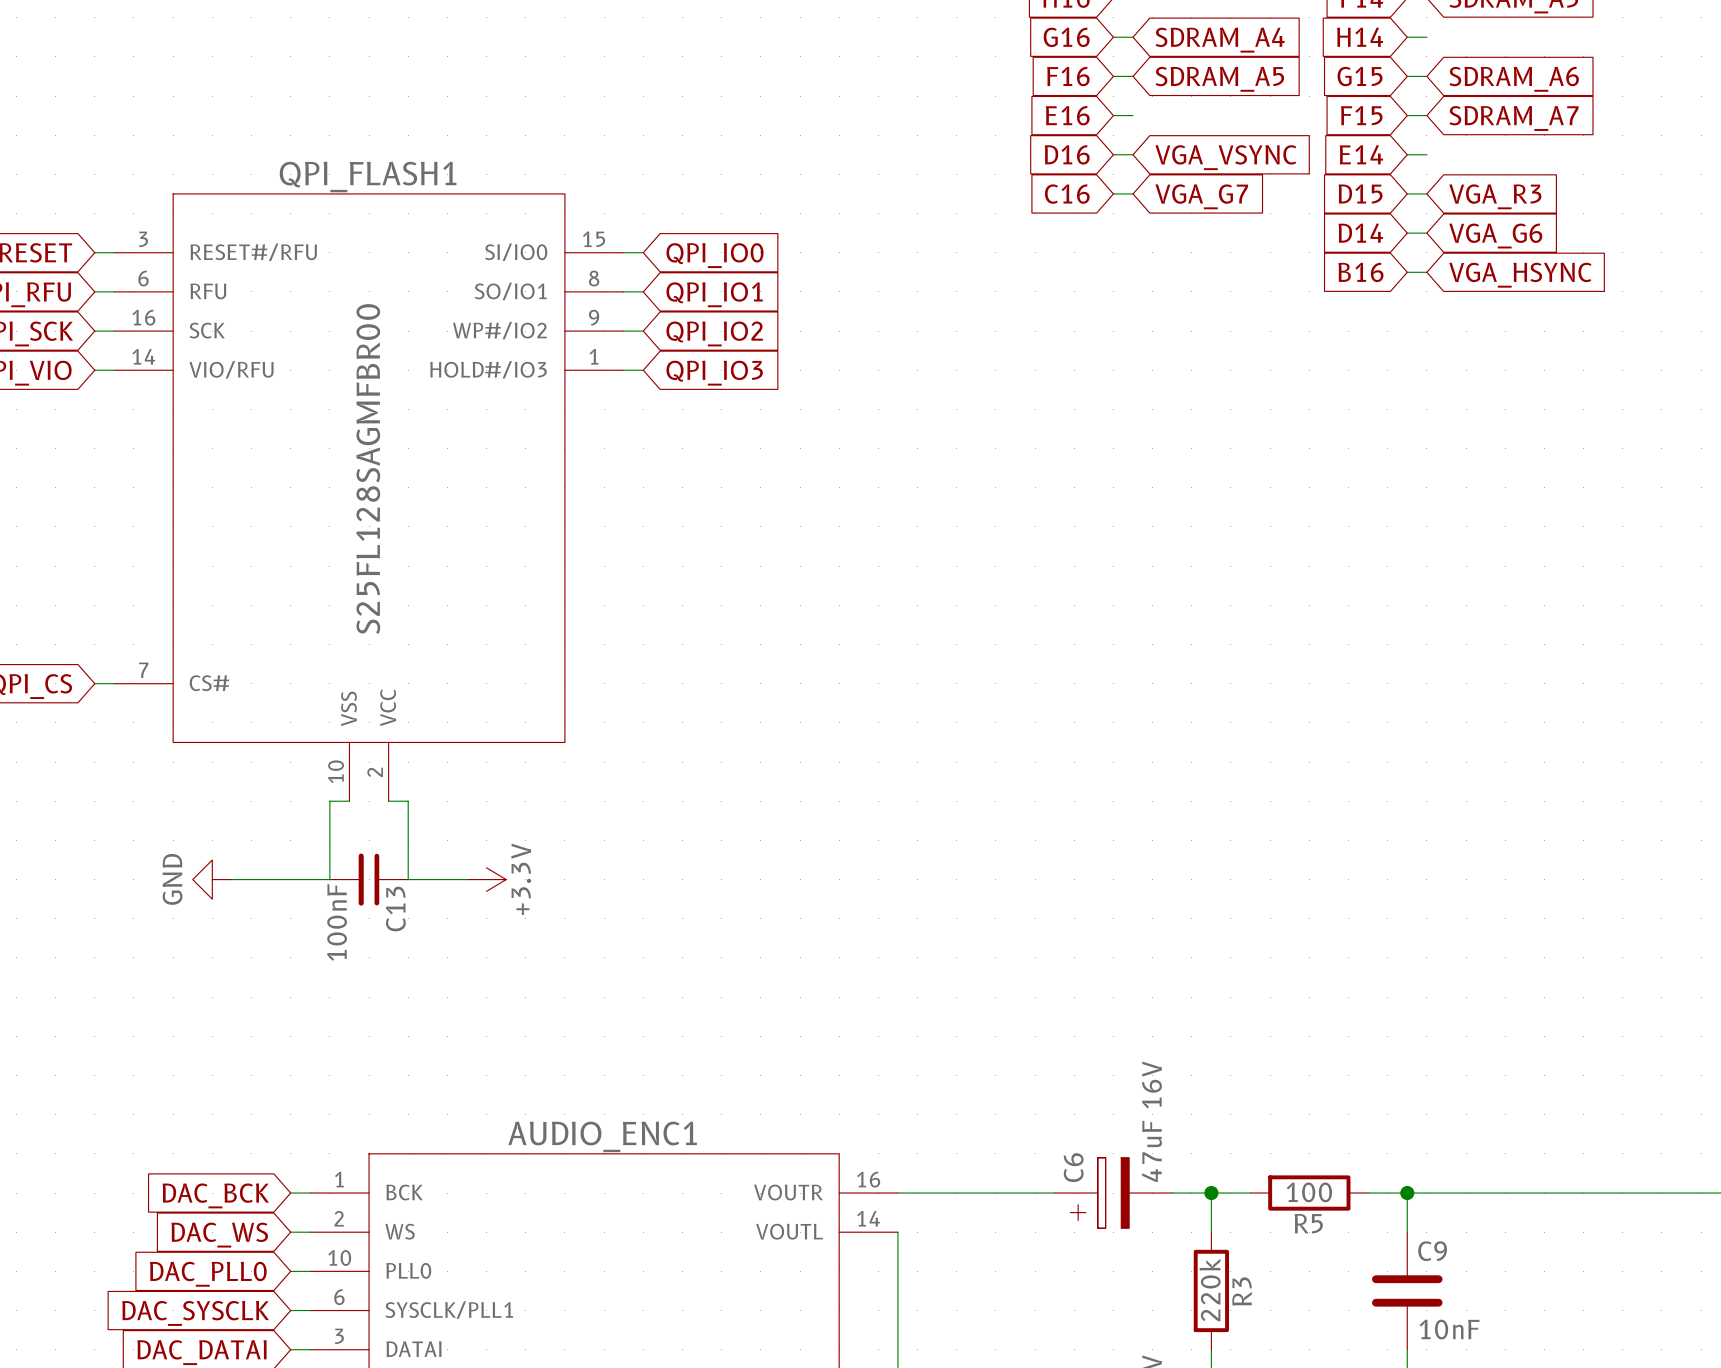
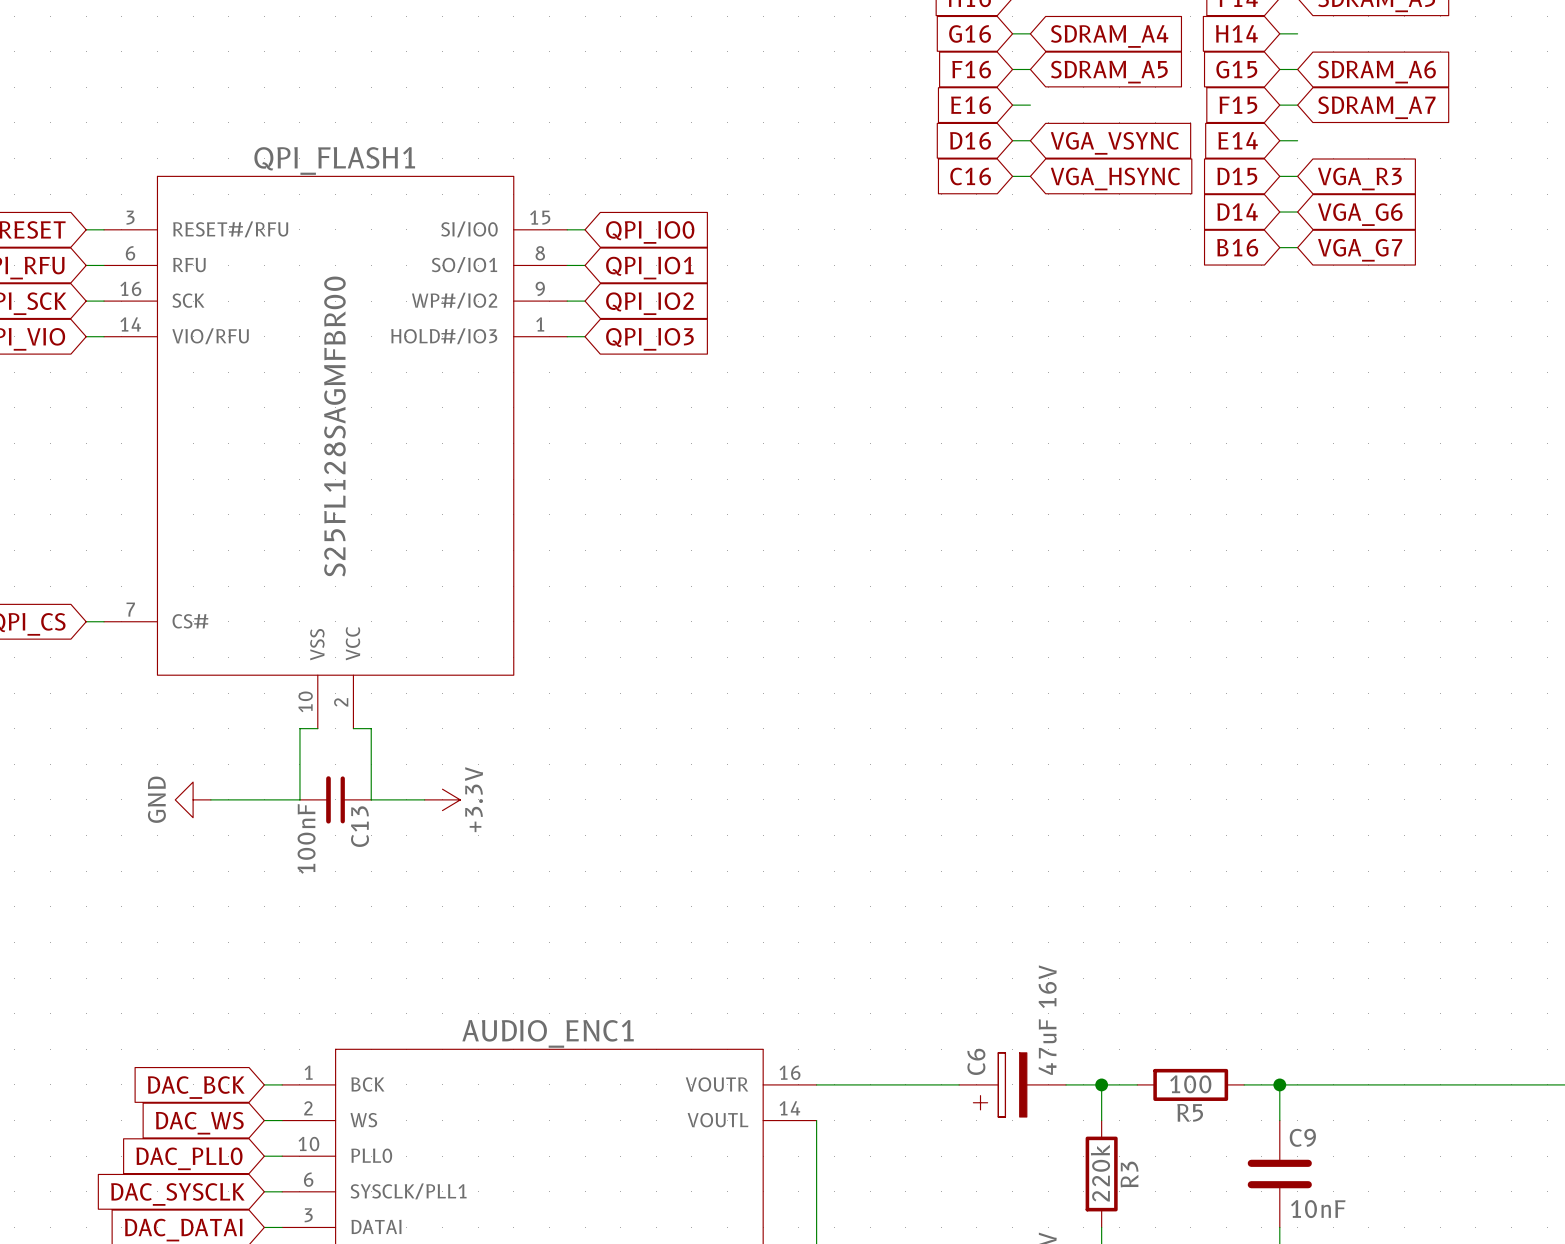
global label: VGA_G7 (1201, 196) -> VGA_HSYNC (1115, 178)
global label: VGA_HSYNC (1520, 275) -> VGA_G7 (1360, 250)

